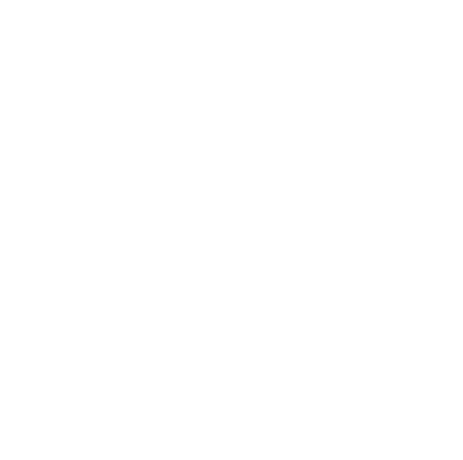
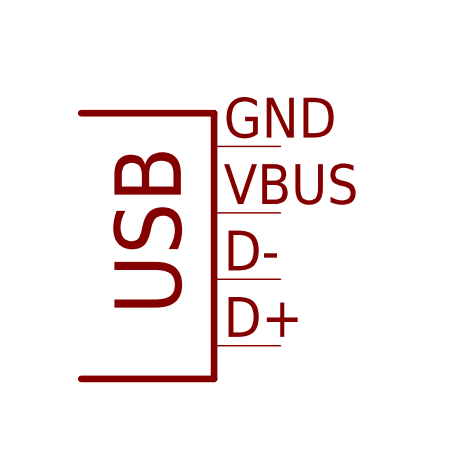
part: none -> (179, 246)

